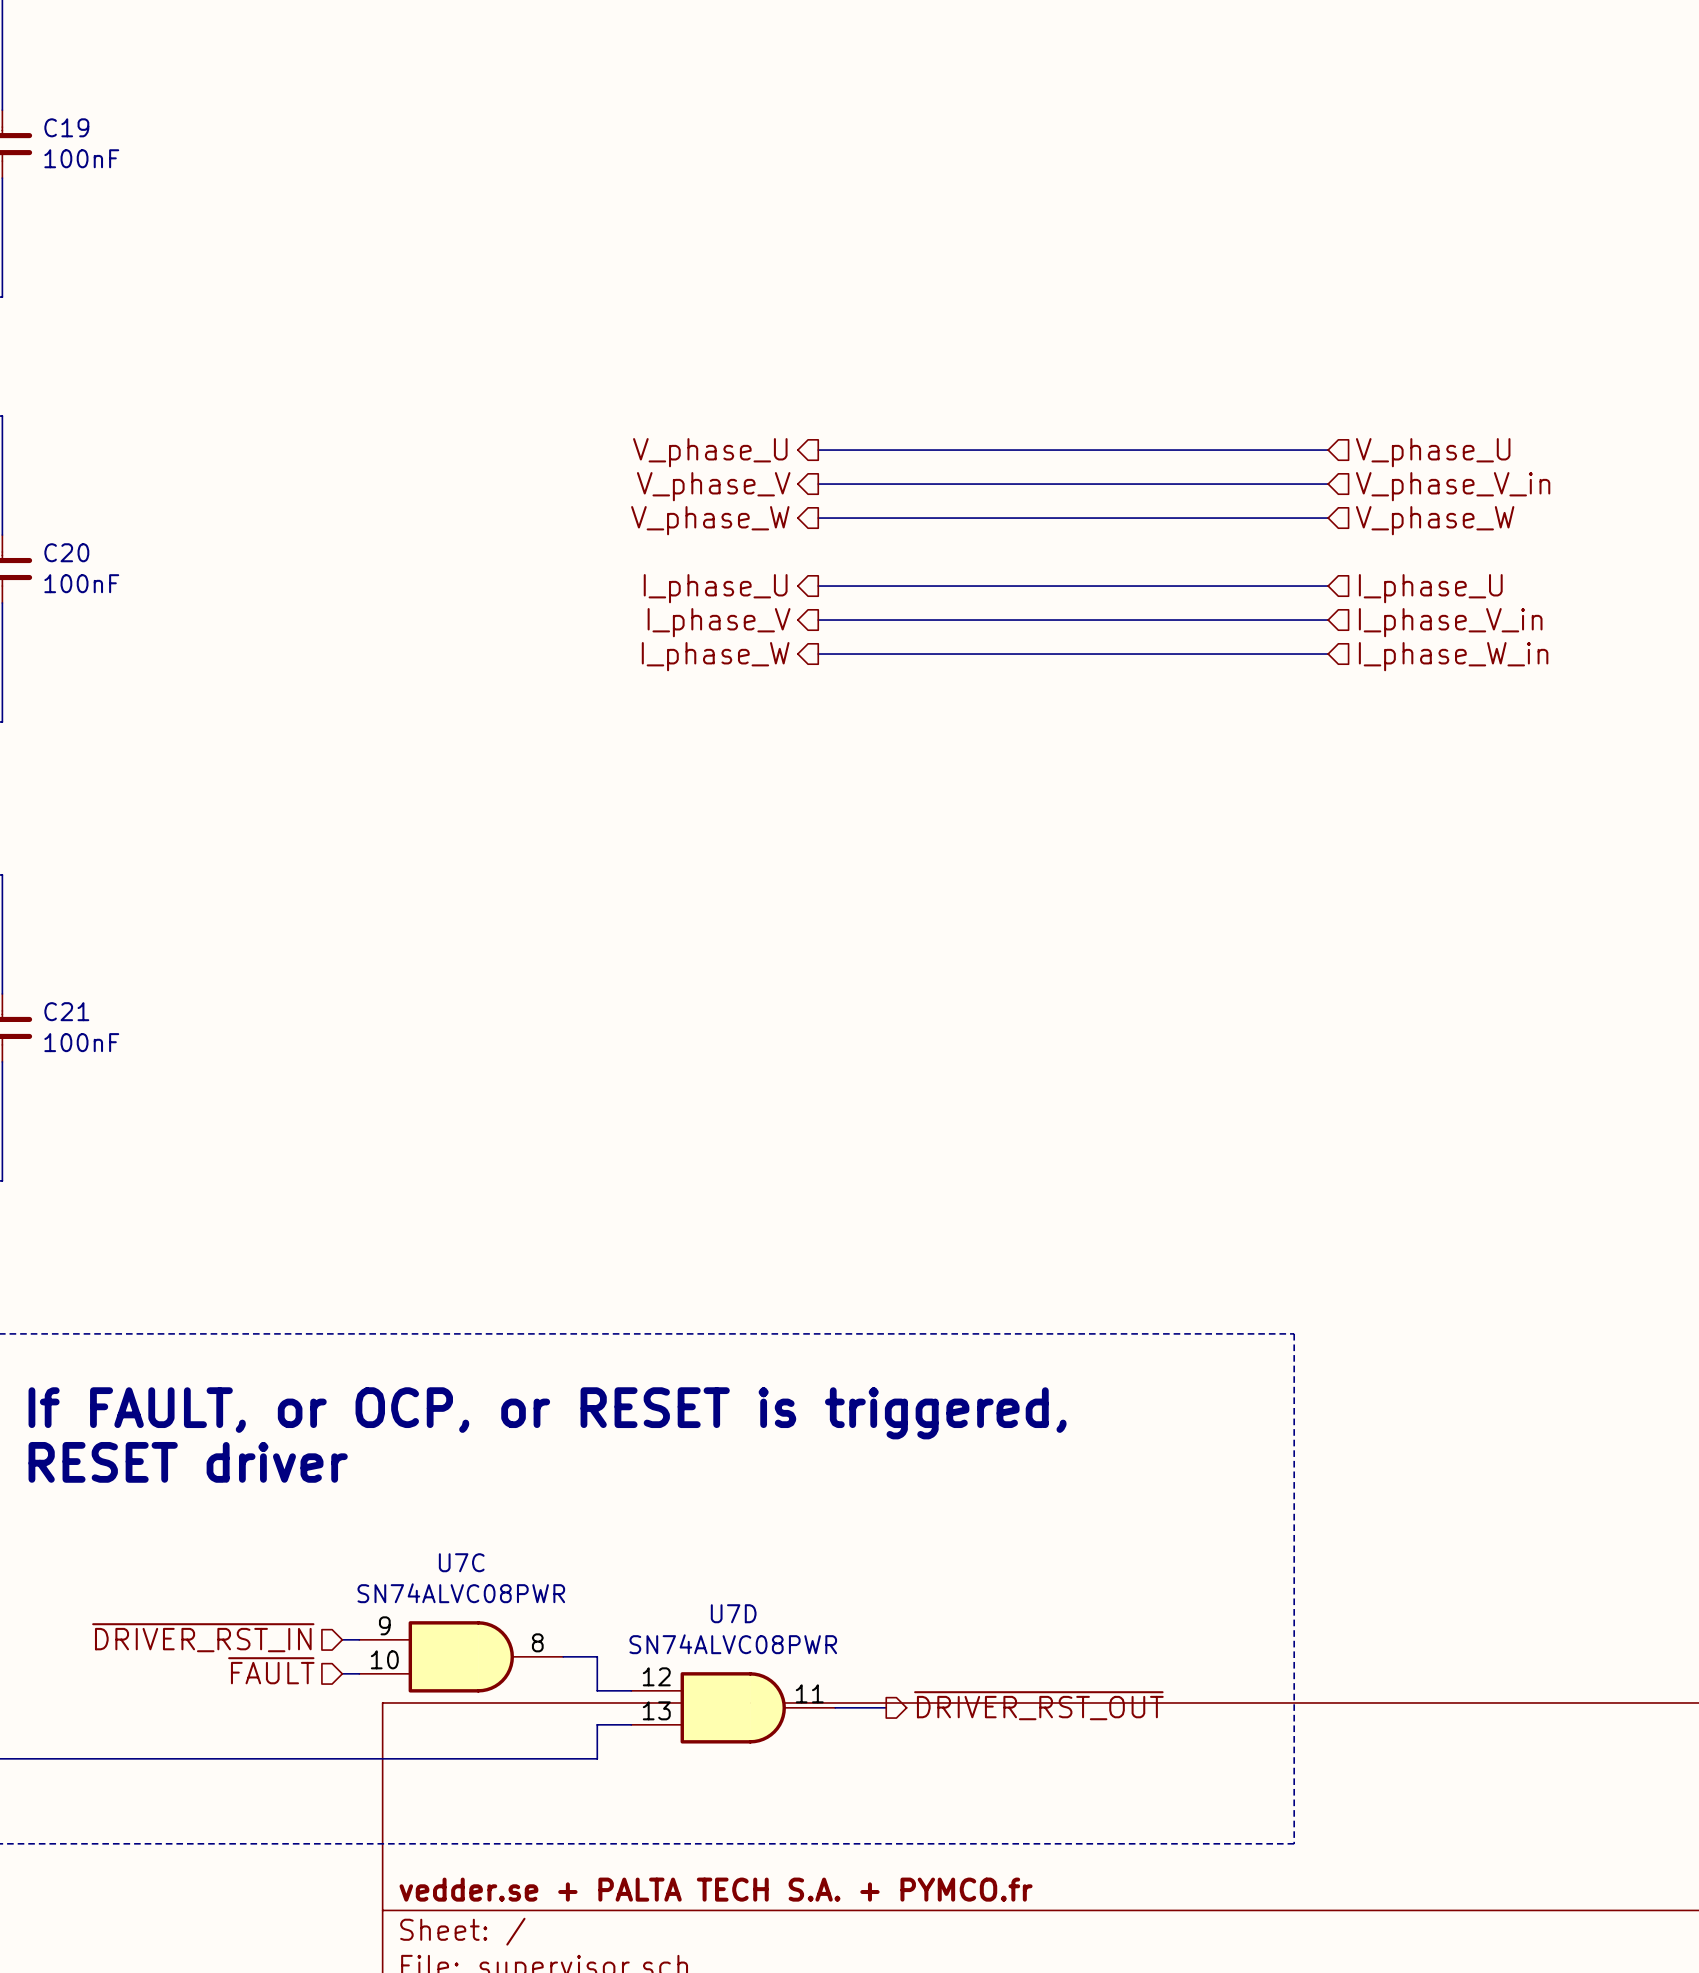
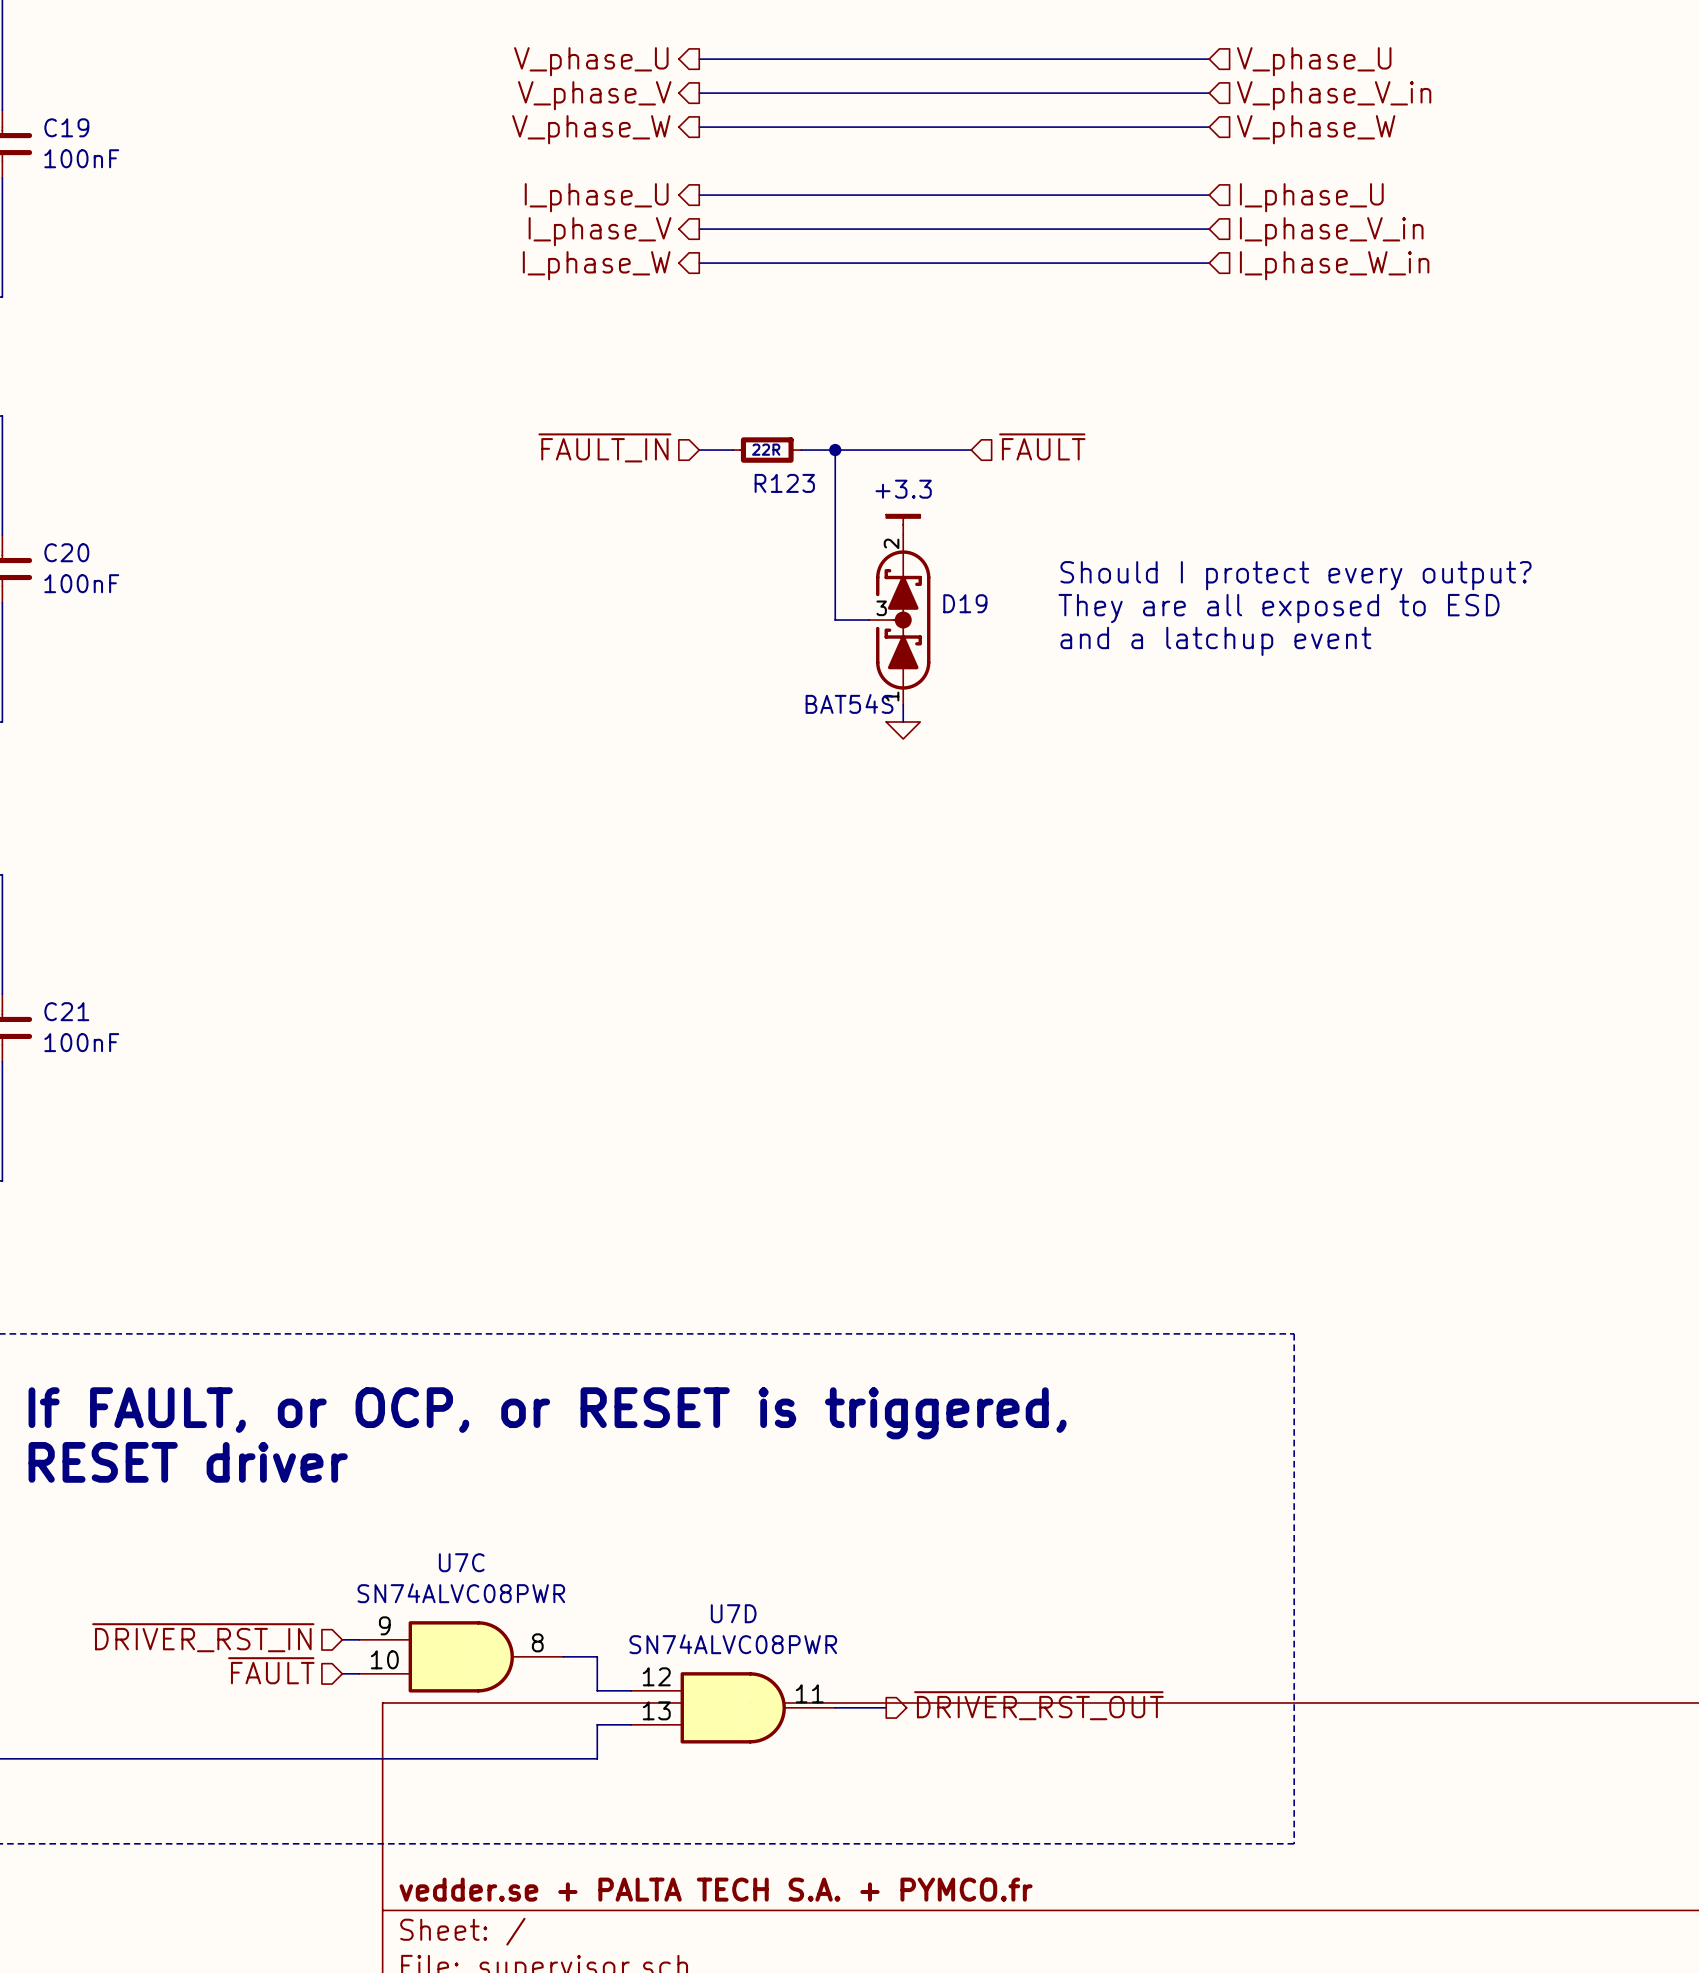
wire: none -> (699, 59) (1209, 59)
hierarchical label: none -> V_phase_U (591, 61)
hierarchical label: none -> V_phase_U (1314, 61)
wire: none -> (699, 93) (1209, 93)
hierarchical label: none -> V_phase_V (594, 95)
hierarchical label: none -> V_phase_V_in (1334, 95)
wire: none -> (699, 127) (1209, 127)
hierarchical label: none -> V_phase_W (591, 129)
hierarchical label: none -> V_phase_W (1316, 129)
wire: none -> (699, 195) (1209, 195)
hierarchical label: none -> I_phase_U (596, 197)
hierarchical label: none -> I_phase_U (1311, 197)
hierarchical label: none -> I_phase_V (600, 231)
hierarchical label: none -> I_phase_V_in (1331, 231)
hierarchical label: none -> I_phase_W (596, 265)
hierarchical label: none -> I_phase_W_in (1334, 265)
hierarchical label: none -> ~{FAULT} (1042, 446)
hierarchical label: none -> ~{FAULT_IN} (604, 447)
wire: none -> (699, 450) (733, 450)
R123: none -> 22R (767, 450)
wire: none -> (801, 450) (818, 450)
junction: none -> (835, 450)
wire: (971, 450) (1328, 450) -> none
hierarchical label: V_phase_U (710, 452) -> none
hierarchical label: V_phase_U (1433, 452) -> none
wire: (818, 484) (1328, 484) -> (699, 229) (1209, 229)
hierarchical label: V_phase_V (713, 486) -> none
hierarchical label: V_phase_V_in (1453, 486) -> none
wire: (818, 518) (1328, 518) -> (699, 263) (1209, 263)
hierarchical label: V_phase_W (710, 520) -> none
hierarchical label: V_phase_W (1435, 520) -> none
power symbol: none -> +3.3 (903, 524)
text: none -> Should I protect every output? (1296, 575)
wire: (818, 586) (1328, 586) -> none
hierarchical label: I_phase_U (715, 588) -> none
hierarchical label: I_phase_U (1430, 588) -> none
text: none -> They are all exposed to ESD (1279, 608)
wire: (818, 620) (835, 620) -> (835, 450) (835, 620)
wire: (869, 620) (1328, 620) -> none
D19: none -> BAT54S (899, 620)
hierarchical label: I_phase_V (719, 622) -> none
hierarchical label: I_phase_V_in (1450, 622) -> none
text: none -> and a latchup event (1215, 641)
wire: (818, 654) (1328, 654) -> none
hierarchical label: I_phase_W (715, 656) -> none
hierarchical label: I_phase_W_in (1453, 656) -> none
wire: none -> (903, 705) (903, 722)
power symbol: none -> (903, 730)

